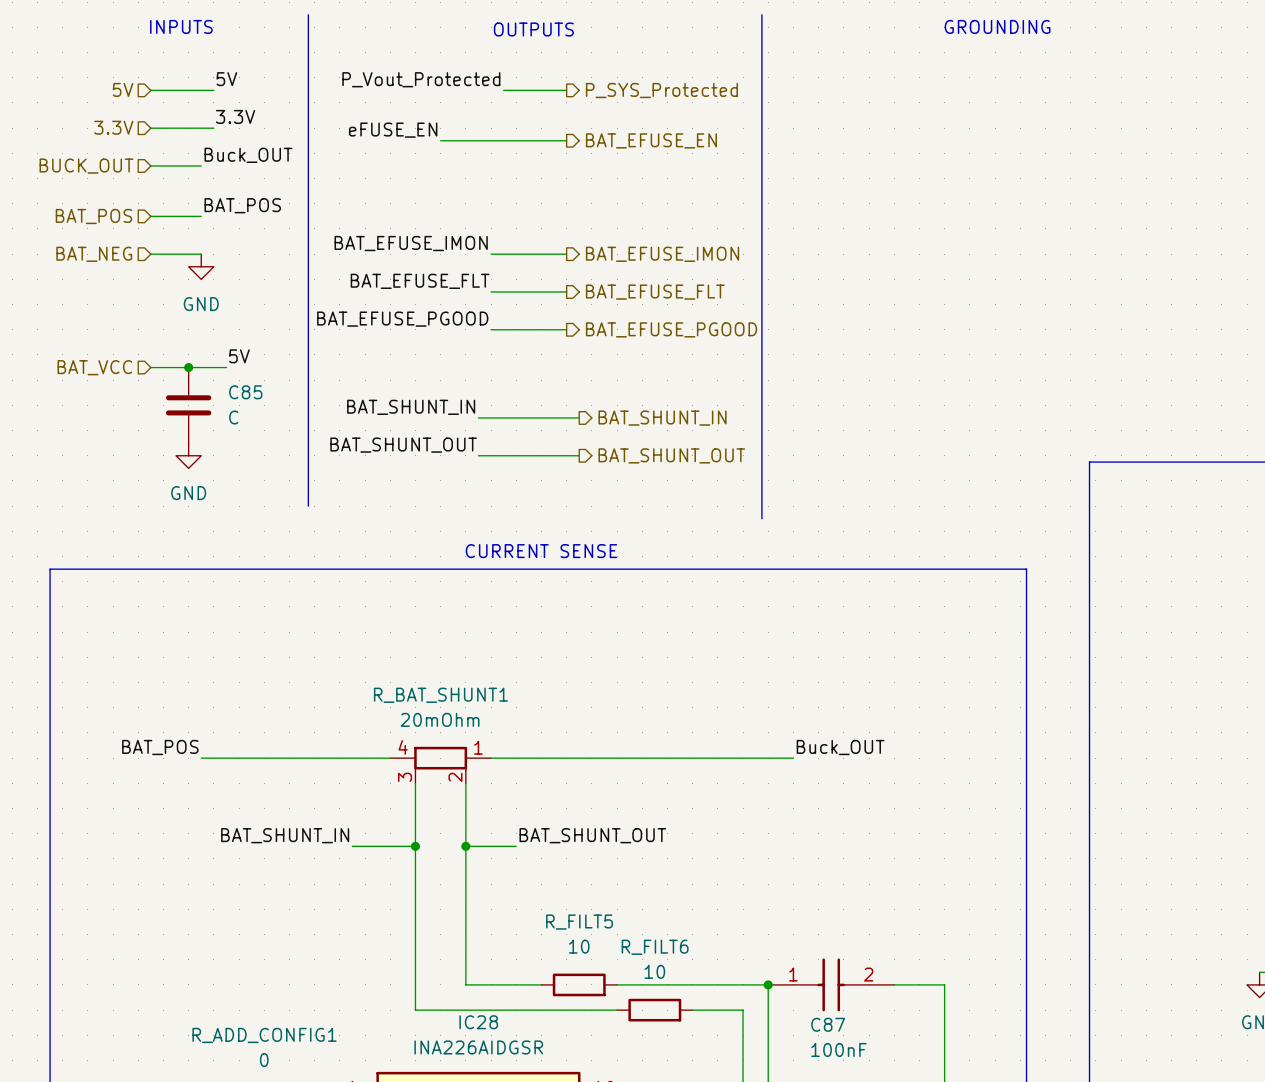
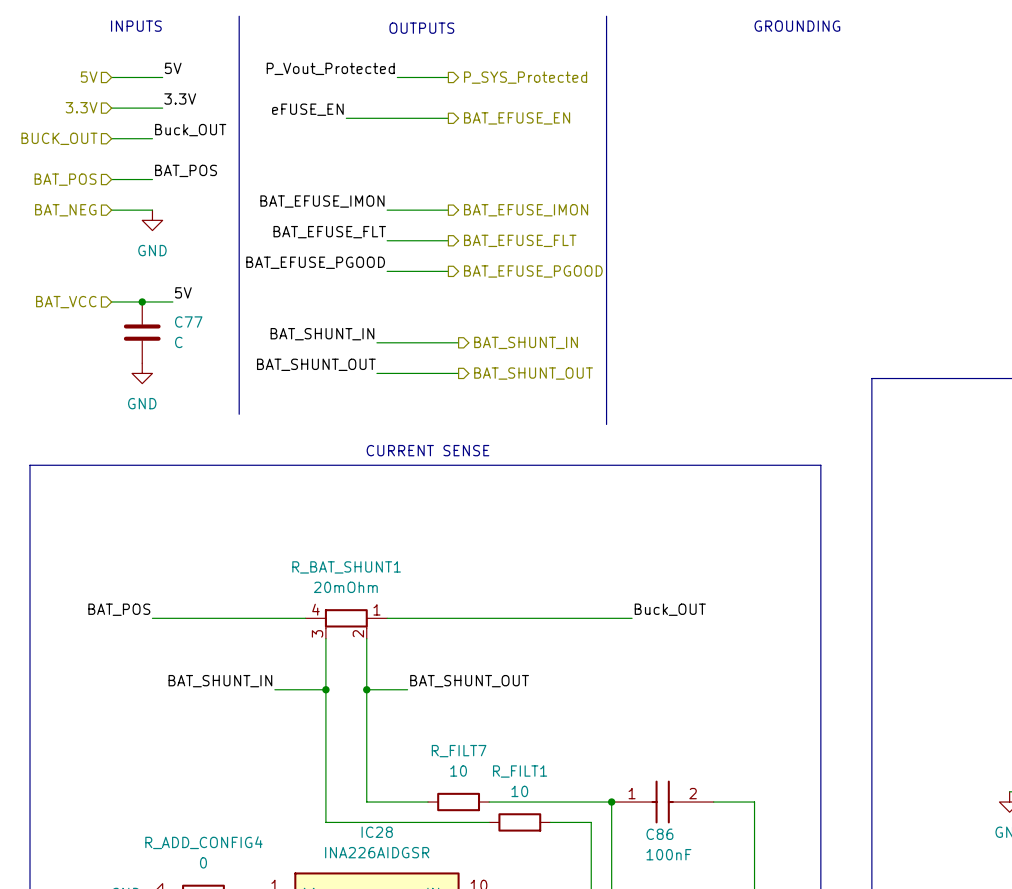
C85 name: C85 (245, 392) -> C77 (188, 322)
R_FILT5 name: R_FILT5 (579, 922) -> R_FILT7 (459, 751)
R_FILT6 name: R_FILT6 (655, 947) -> R_FILT1 (520, 771)
C87 name: C87 (828, 1024) -> C86 (659, 834)
R_ADD_CONFIG1 name: R_ADD_CONFIG1 (264, 1035) -> R_ADD_CONFIG4 (203, 842)

